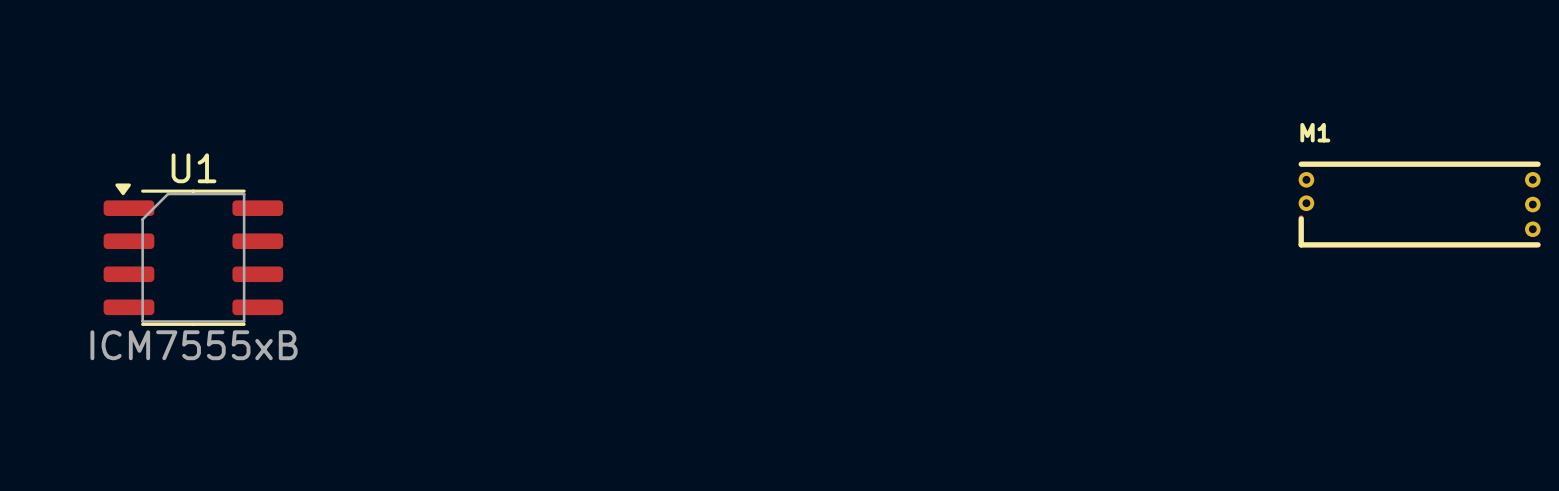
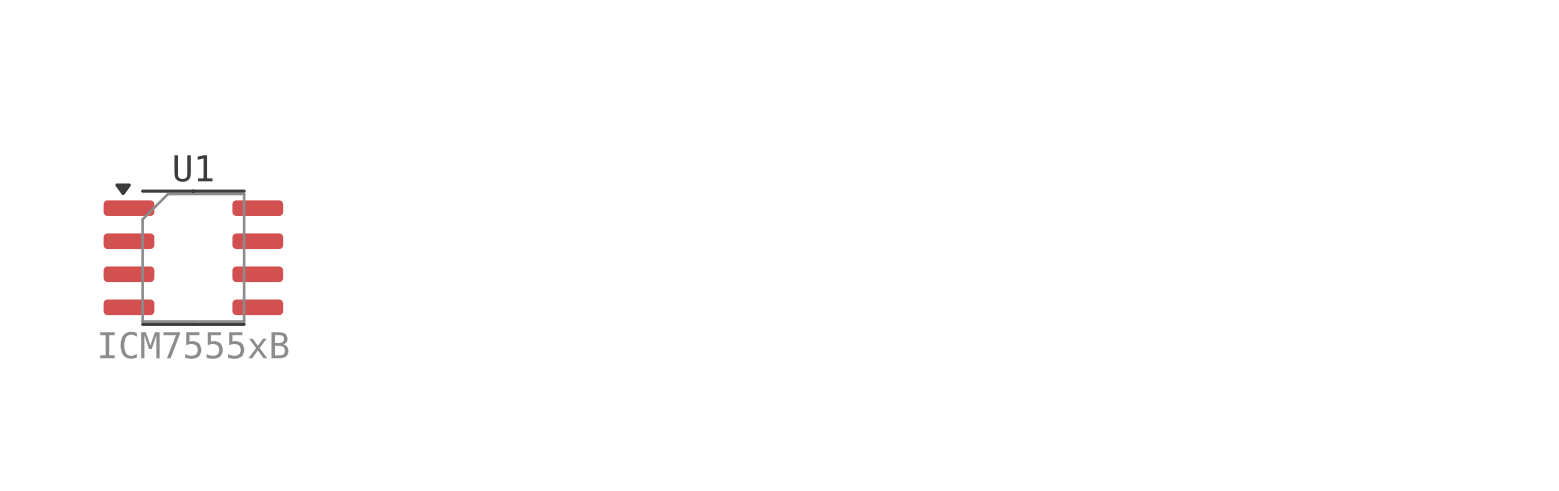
M1: (1419, 204) -> none

